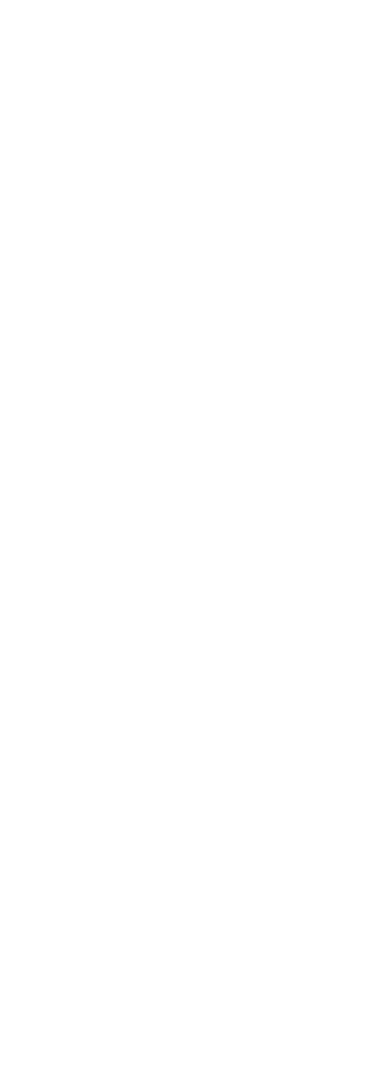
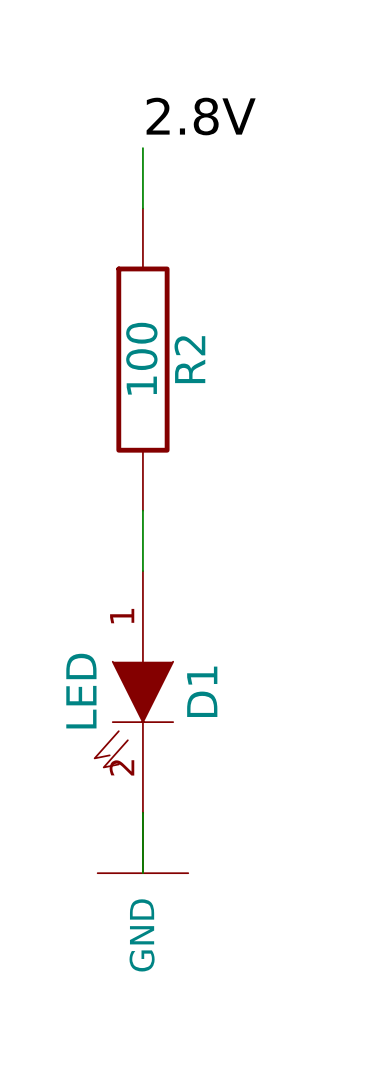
label: none -> 2.8V (201, 116)
wire: none -> (142, 148) (142, 208)
R2: none -> 100 (142, 359)
wire: none -> (142, 510) (142, 571)
D1: none -> LED (133, 691)
wire: none -> (142, 812) (142, 873)
power symbol: none -> (142, 842)

